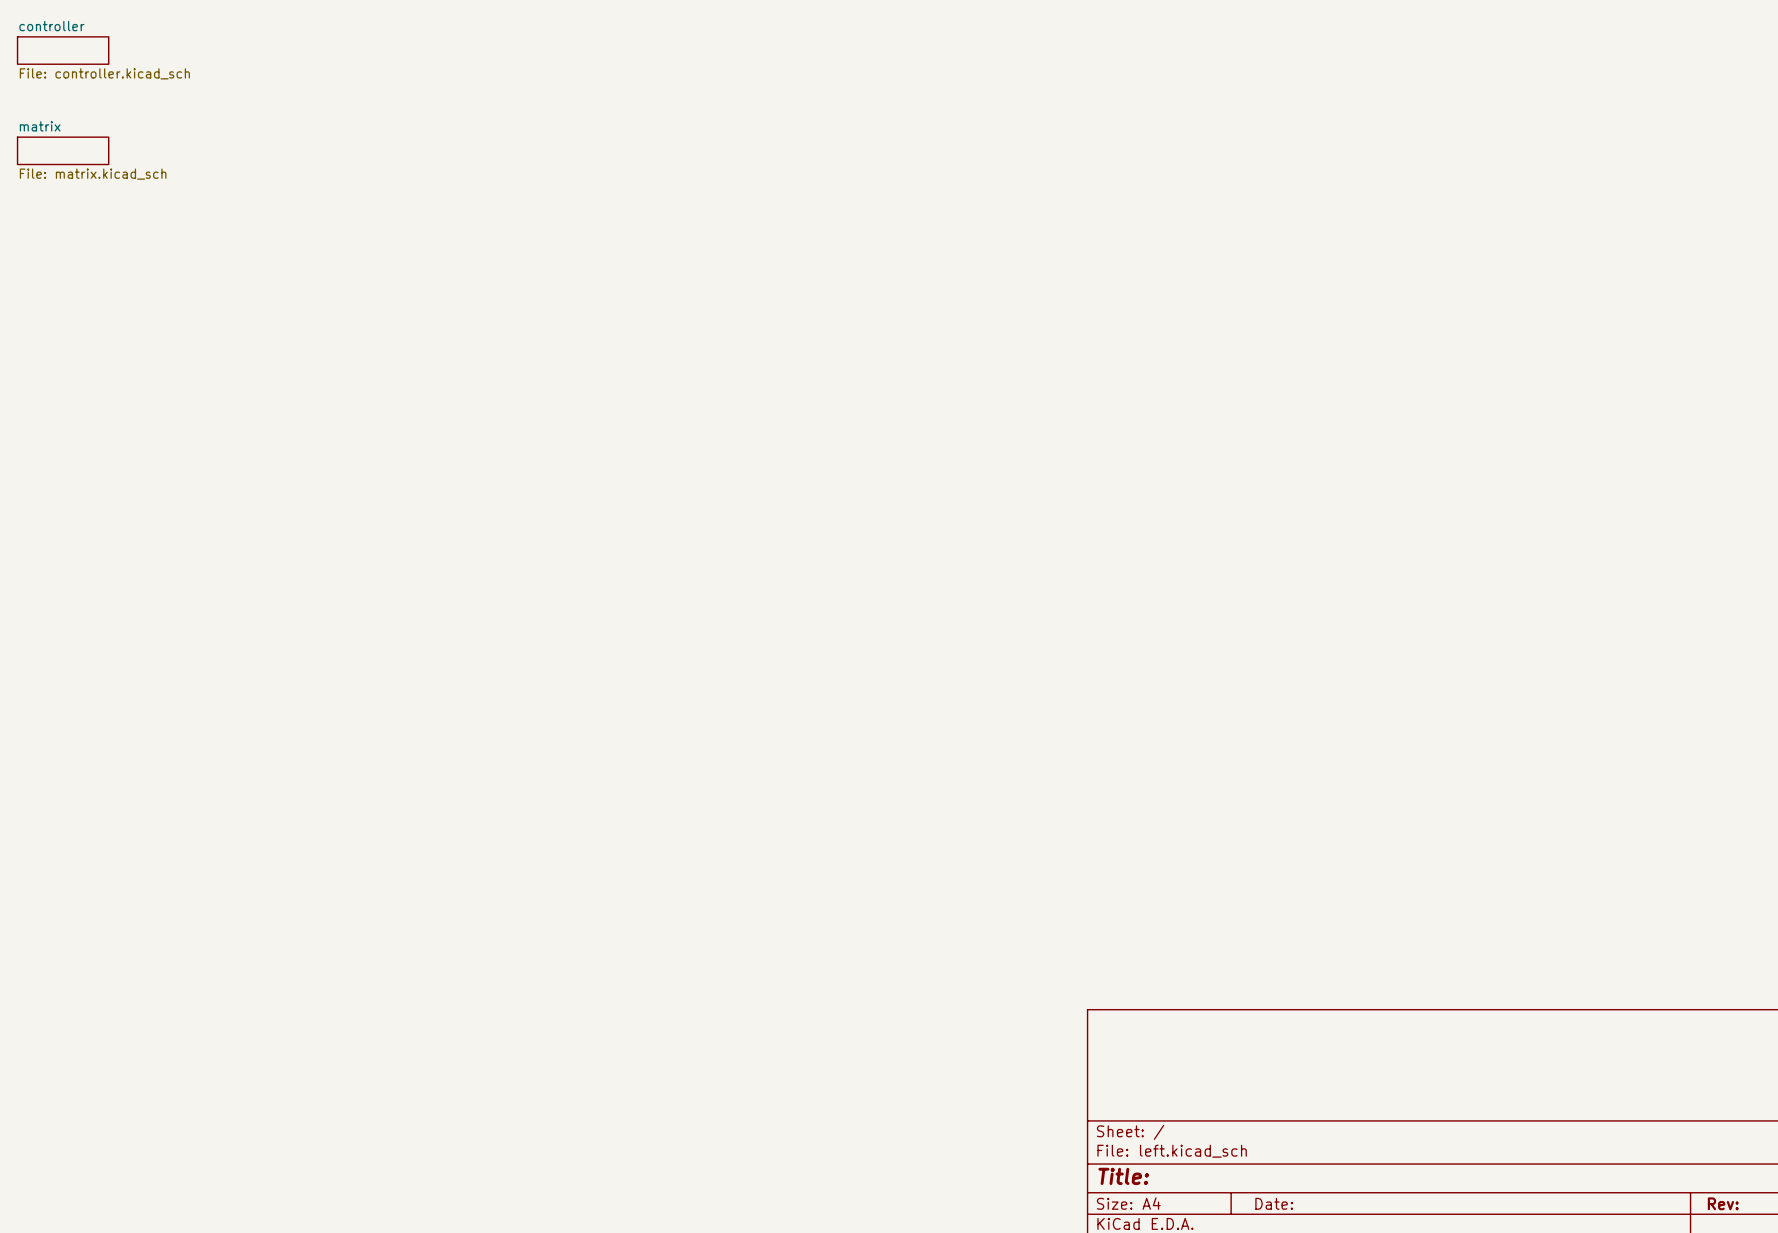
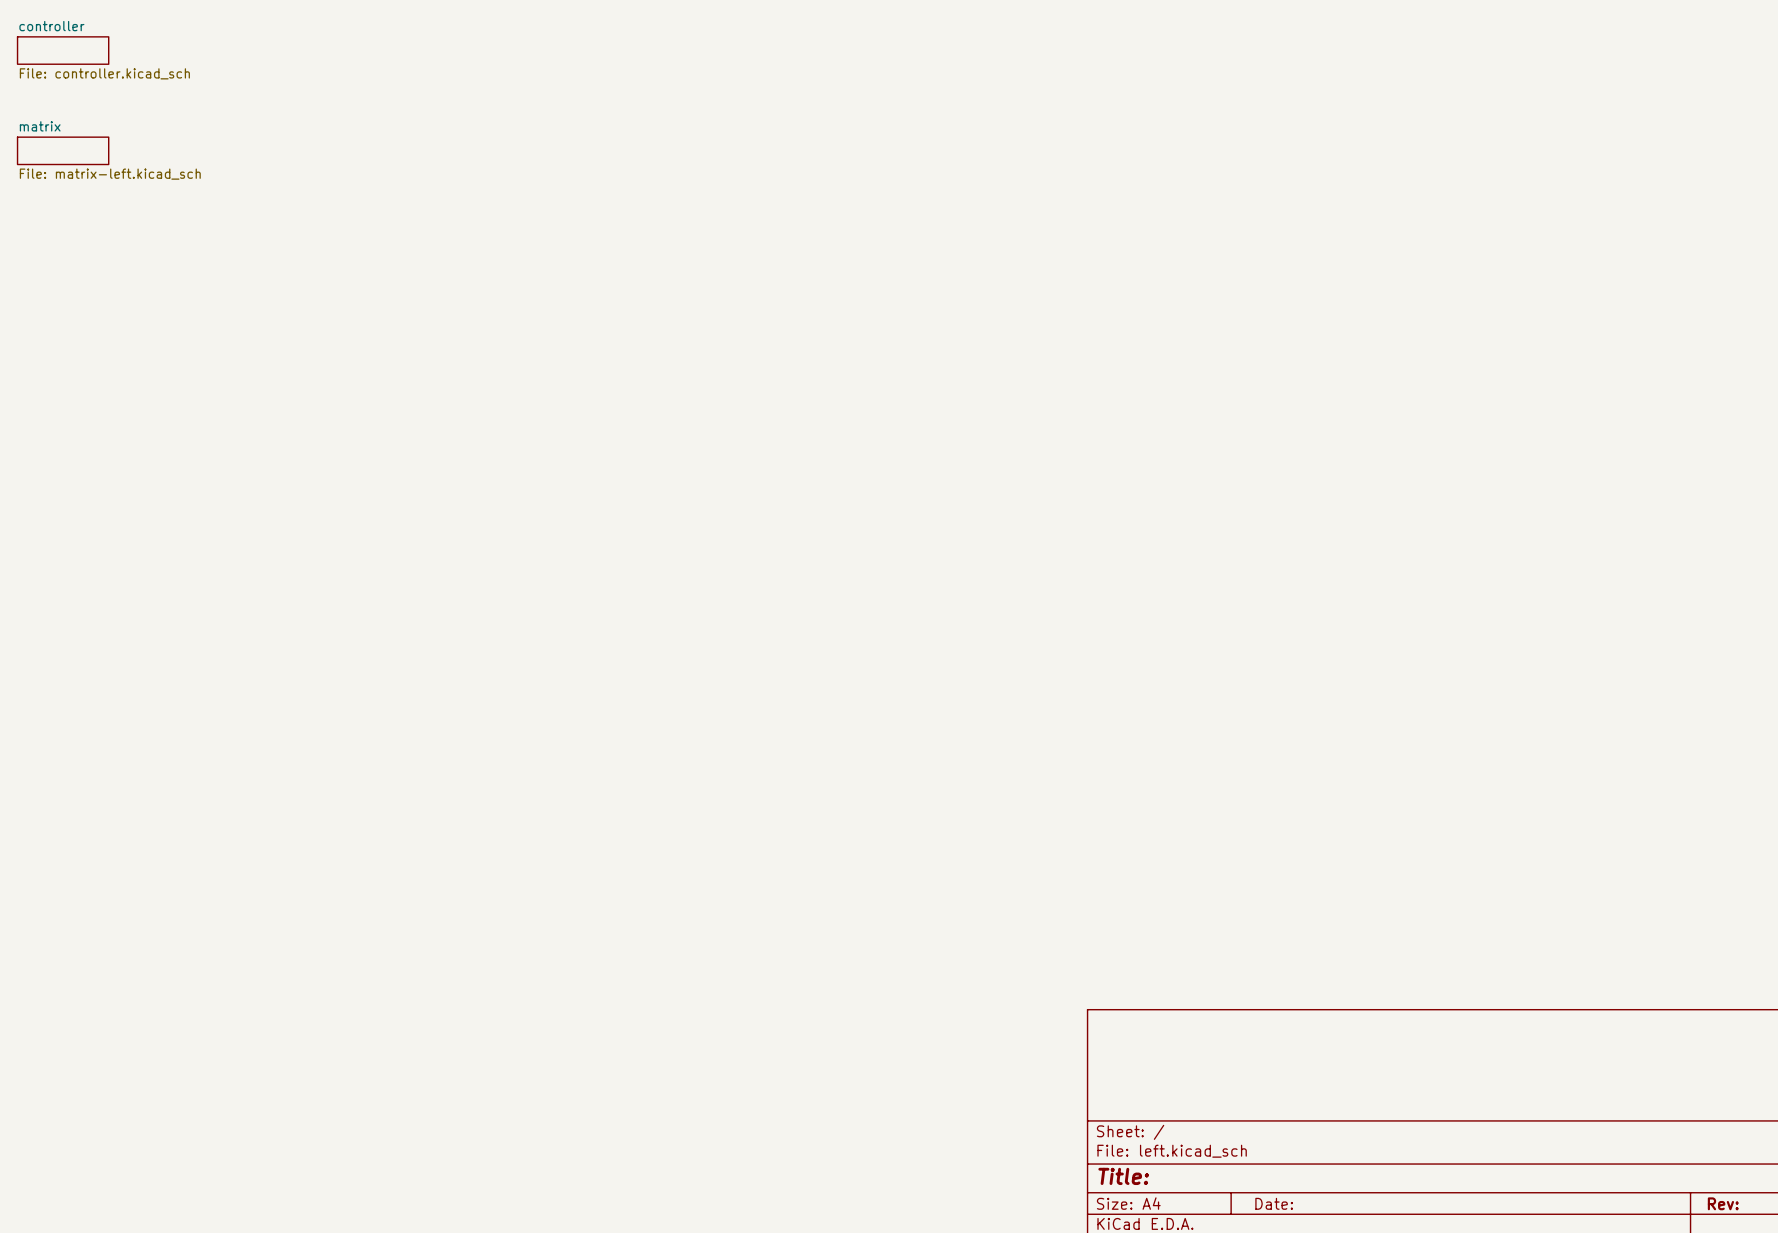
sheet matrix value: File: matrix.kicad_sch (93, 174) -> File: matrix-left.kicad_sch (110, 174)

